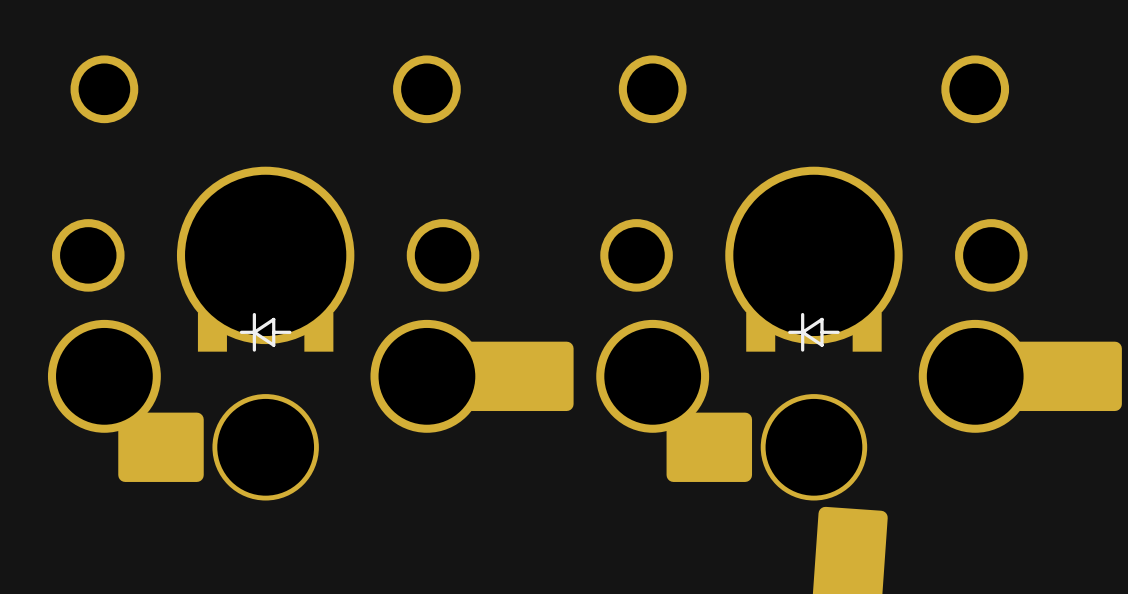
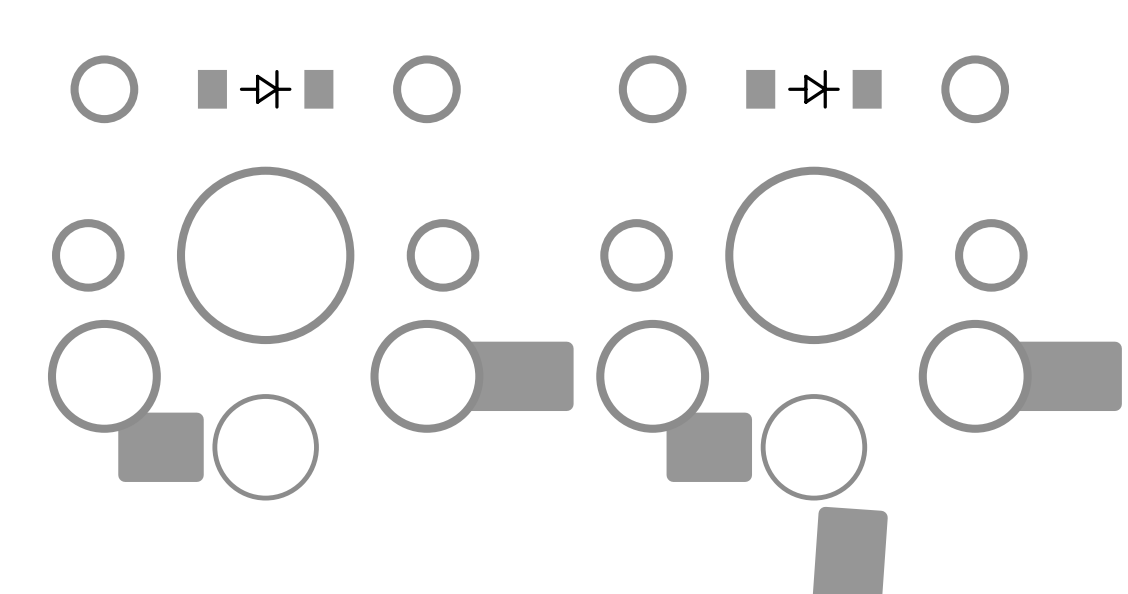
part rotation: 0° (265, 332) -> 180° (265, 89)
part position: (265, 332) -> (265, 89)
part rotation: 0° (813, 332) -> 180° (813, 89)
part position: (813, 332) -> (813, 89)

